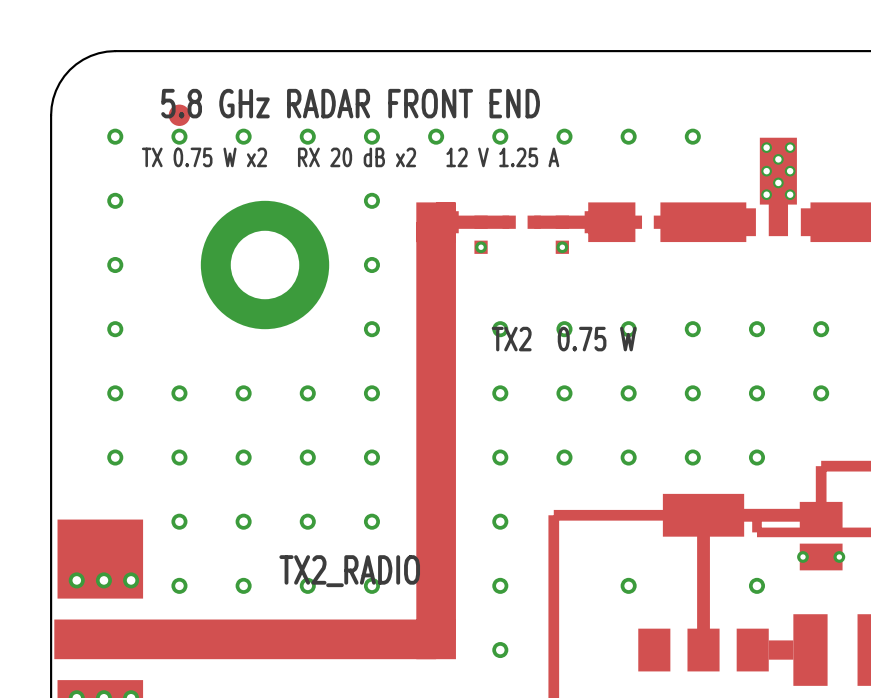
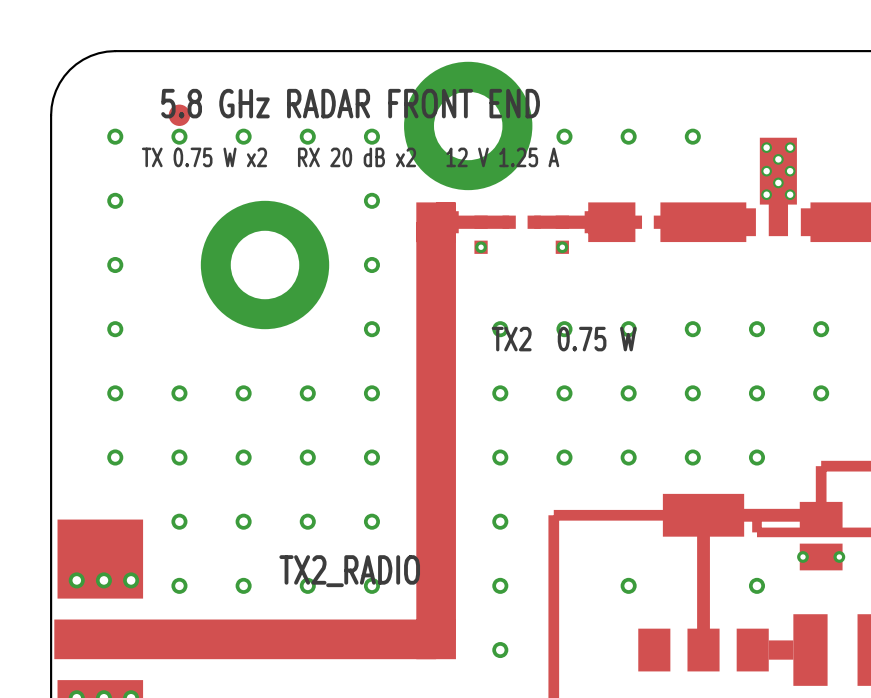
part: none -> (468, 125)
via: (436, 136) -> none
via: (500, 136) -> none

